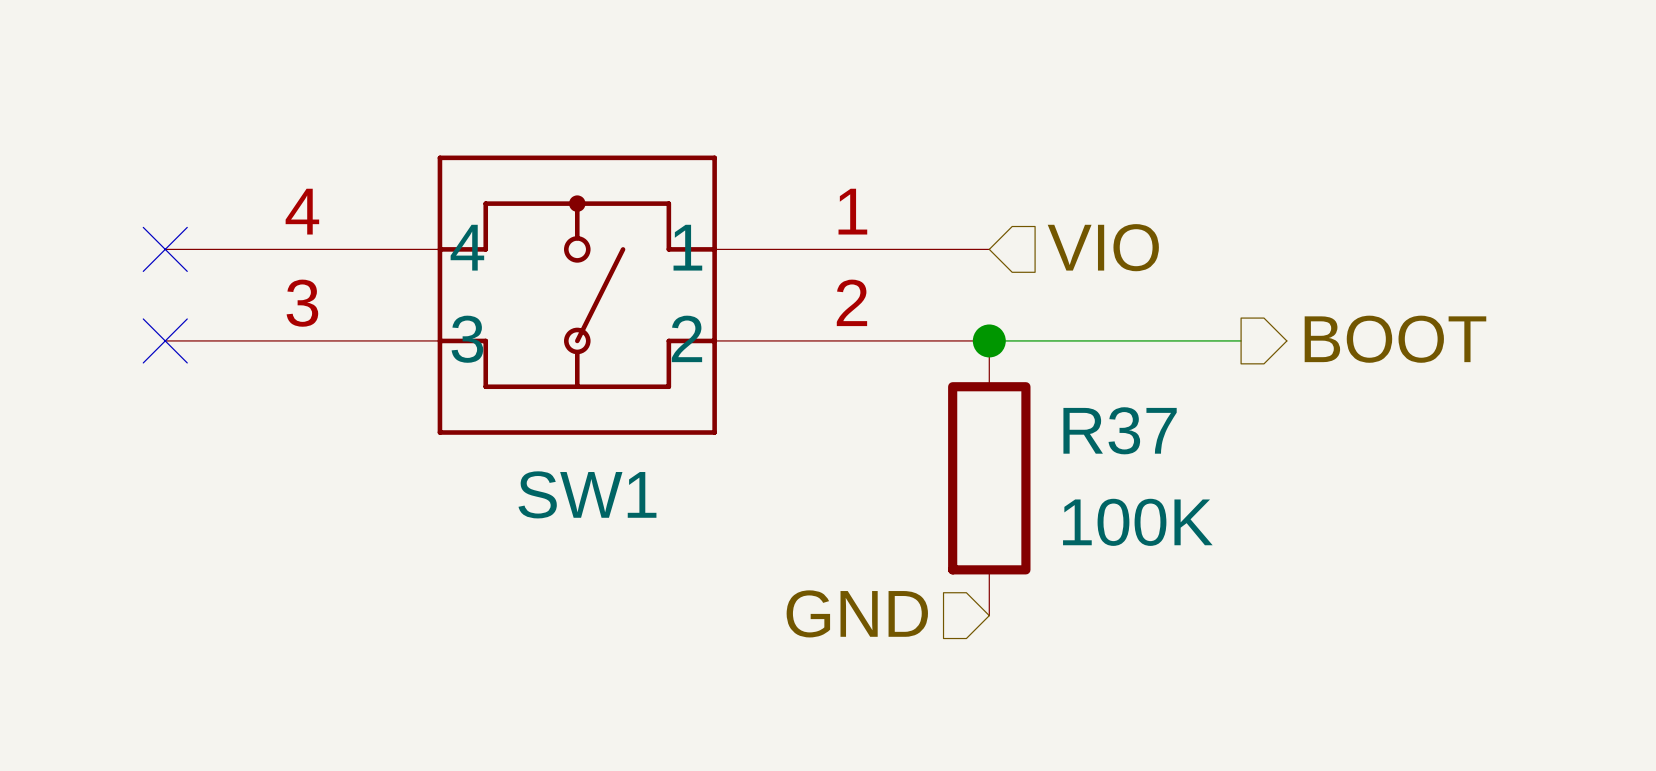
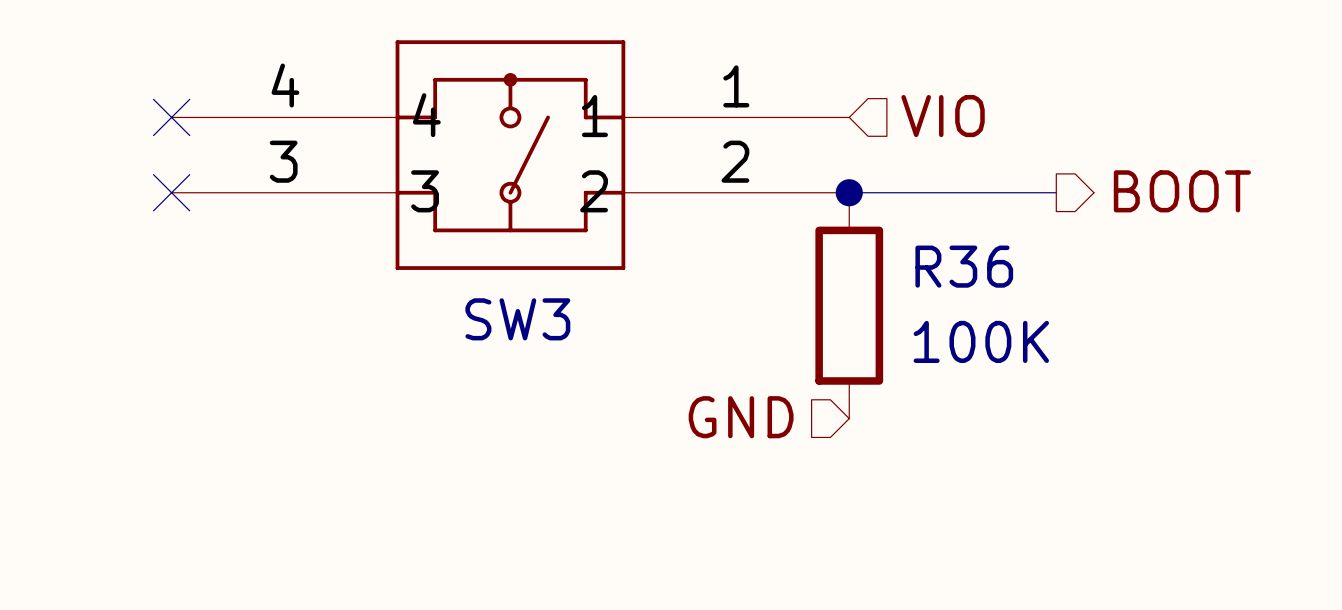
R37 name: R37 (1120, 430) -> R36 (964, 266)
SW1 name: SW1 (587, 494) -> SW3 (517, 319)

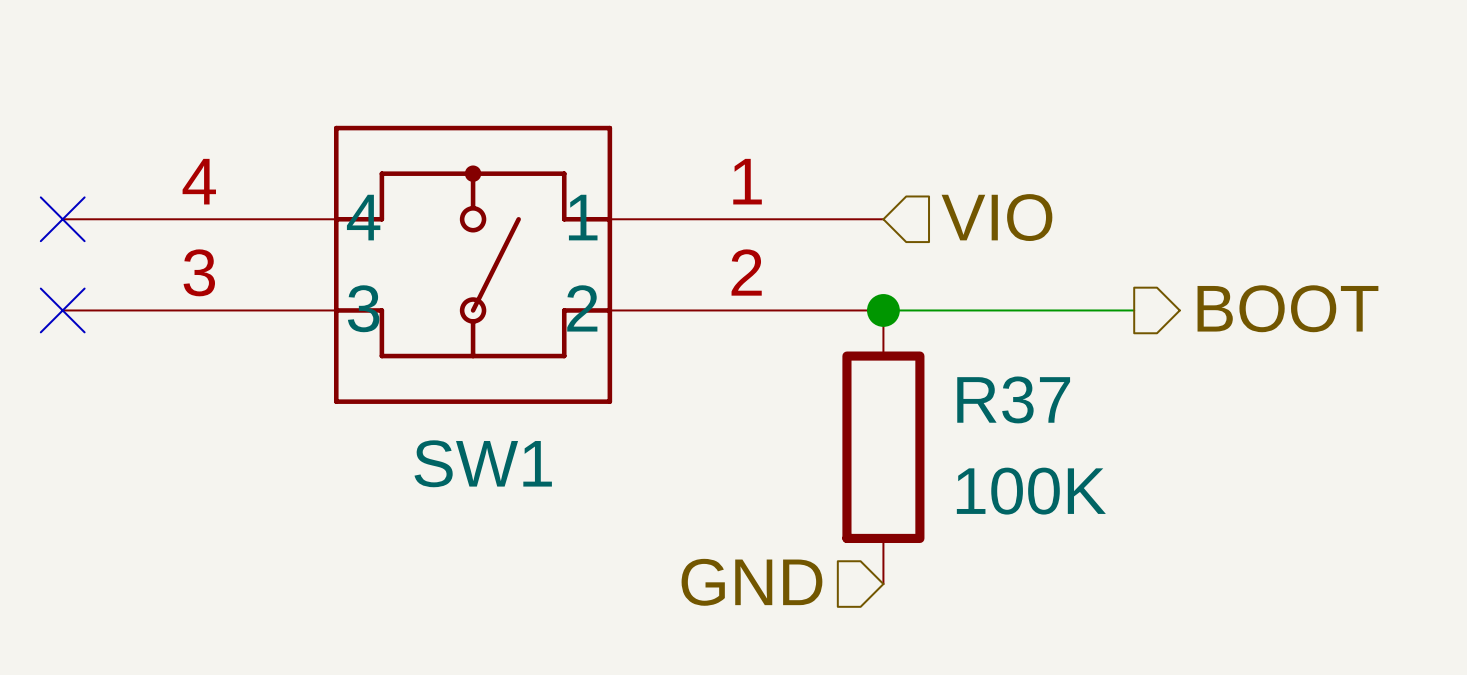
R36 name: R36 (964, 266) -> R37 (1013, 399)
SW3 name: SW3 (517, 319) -> SW1 (483, 463)

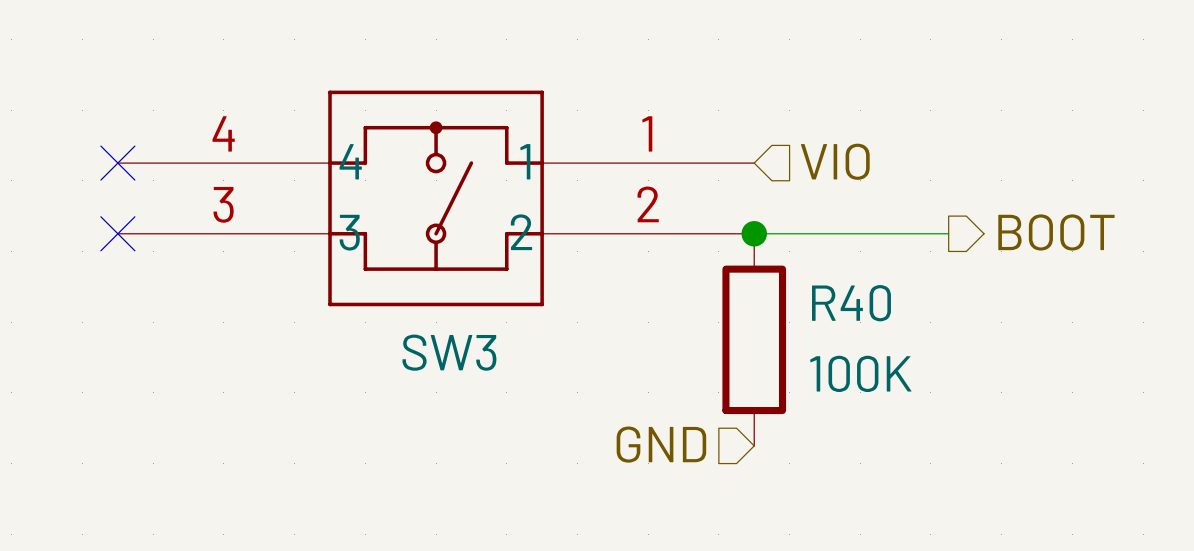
R37 name: R37 (1013, 399) -> R40 (851, 303)
SW1 name: SW1 (483, 463) -> SW3 (449, 352)

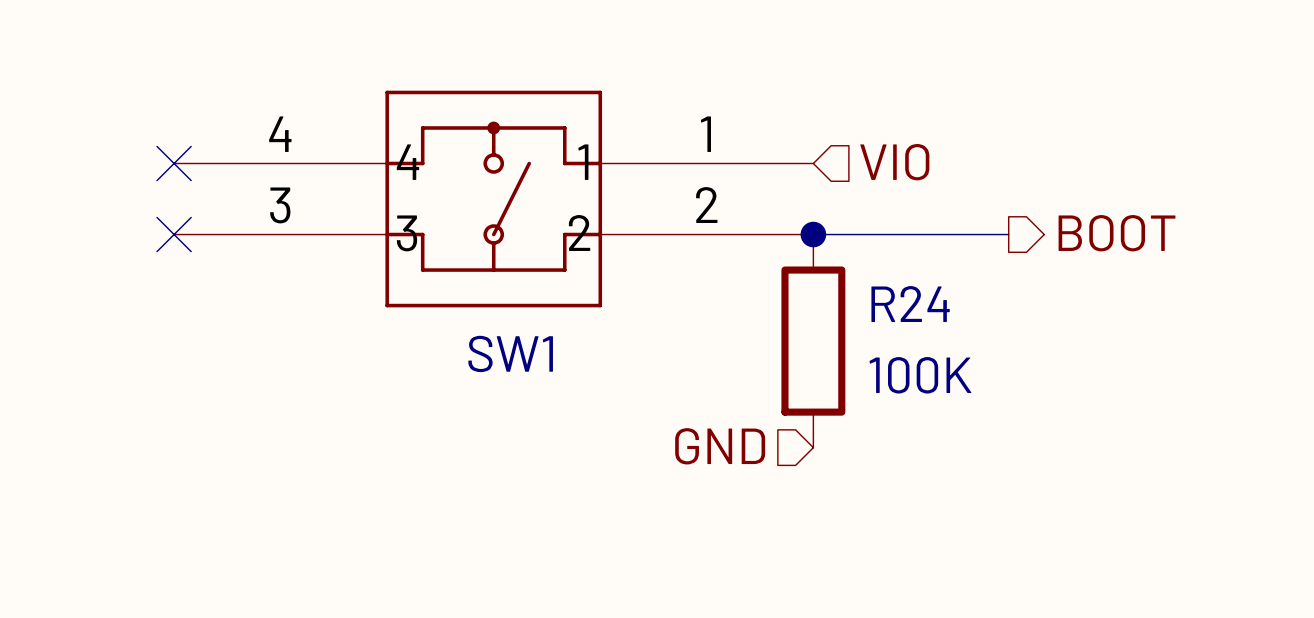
R40 name: R40 (851, 303) -> R24 (910, 304)
SW3 name: SW3 (449, 352) -> SW1 (510, 353)

